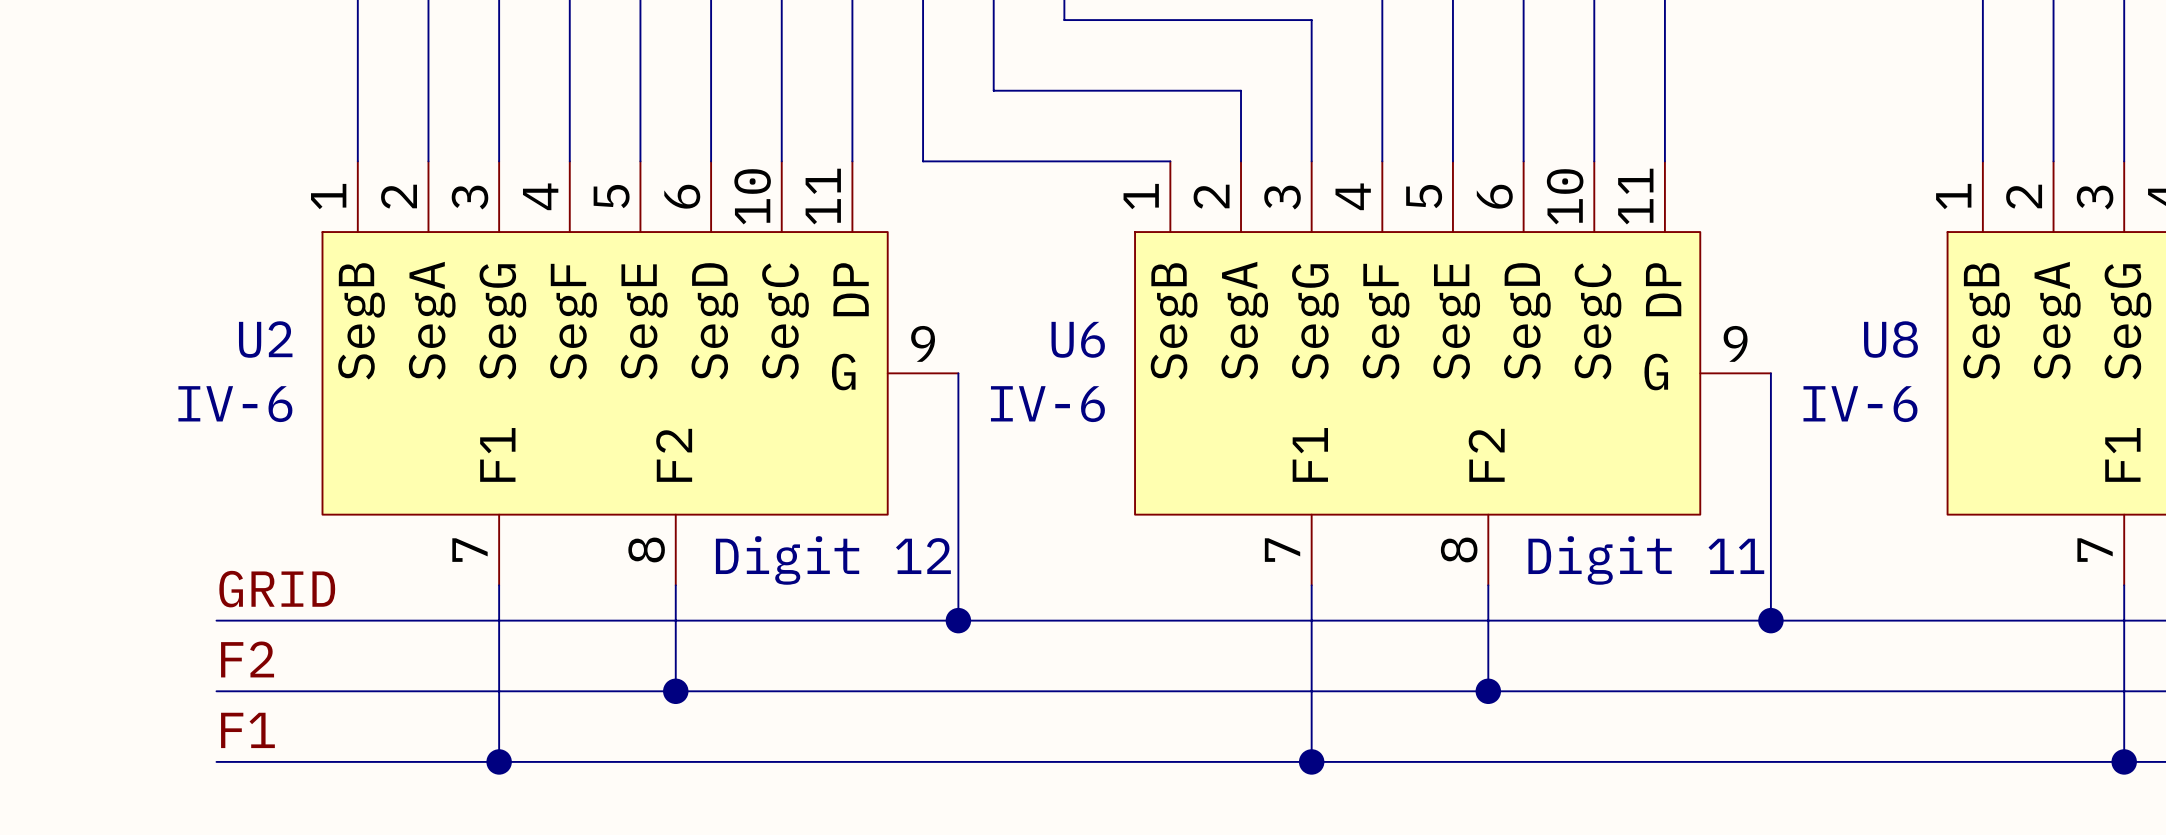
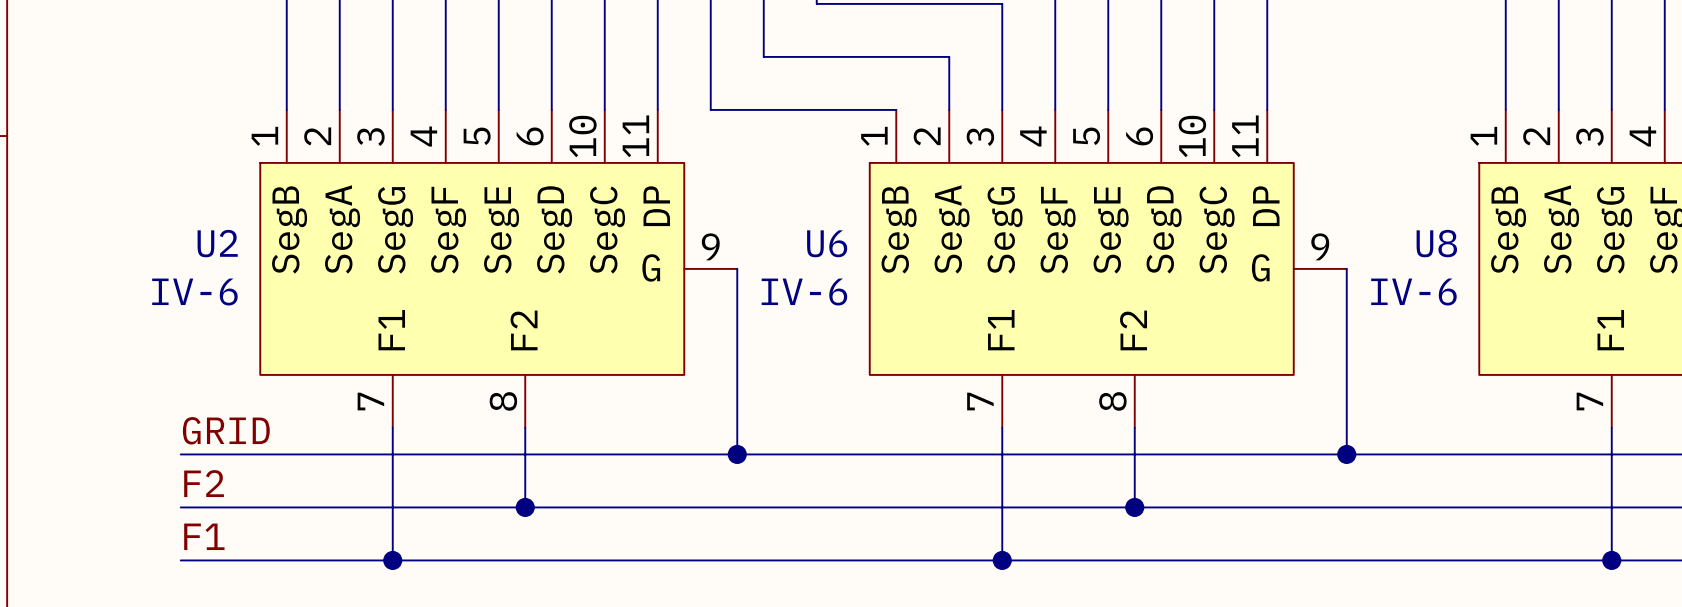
text: Digit 12 (833, 560) -> none
text: Digit 11 (1646, 560) -> none

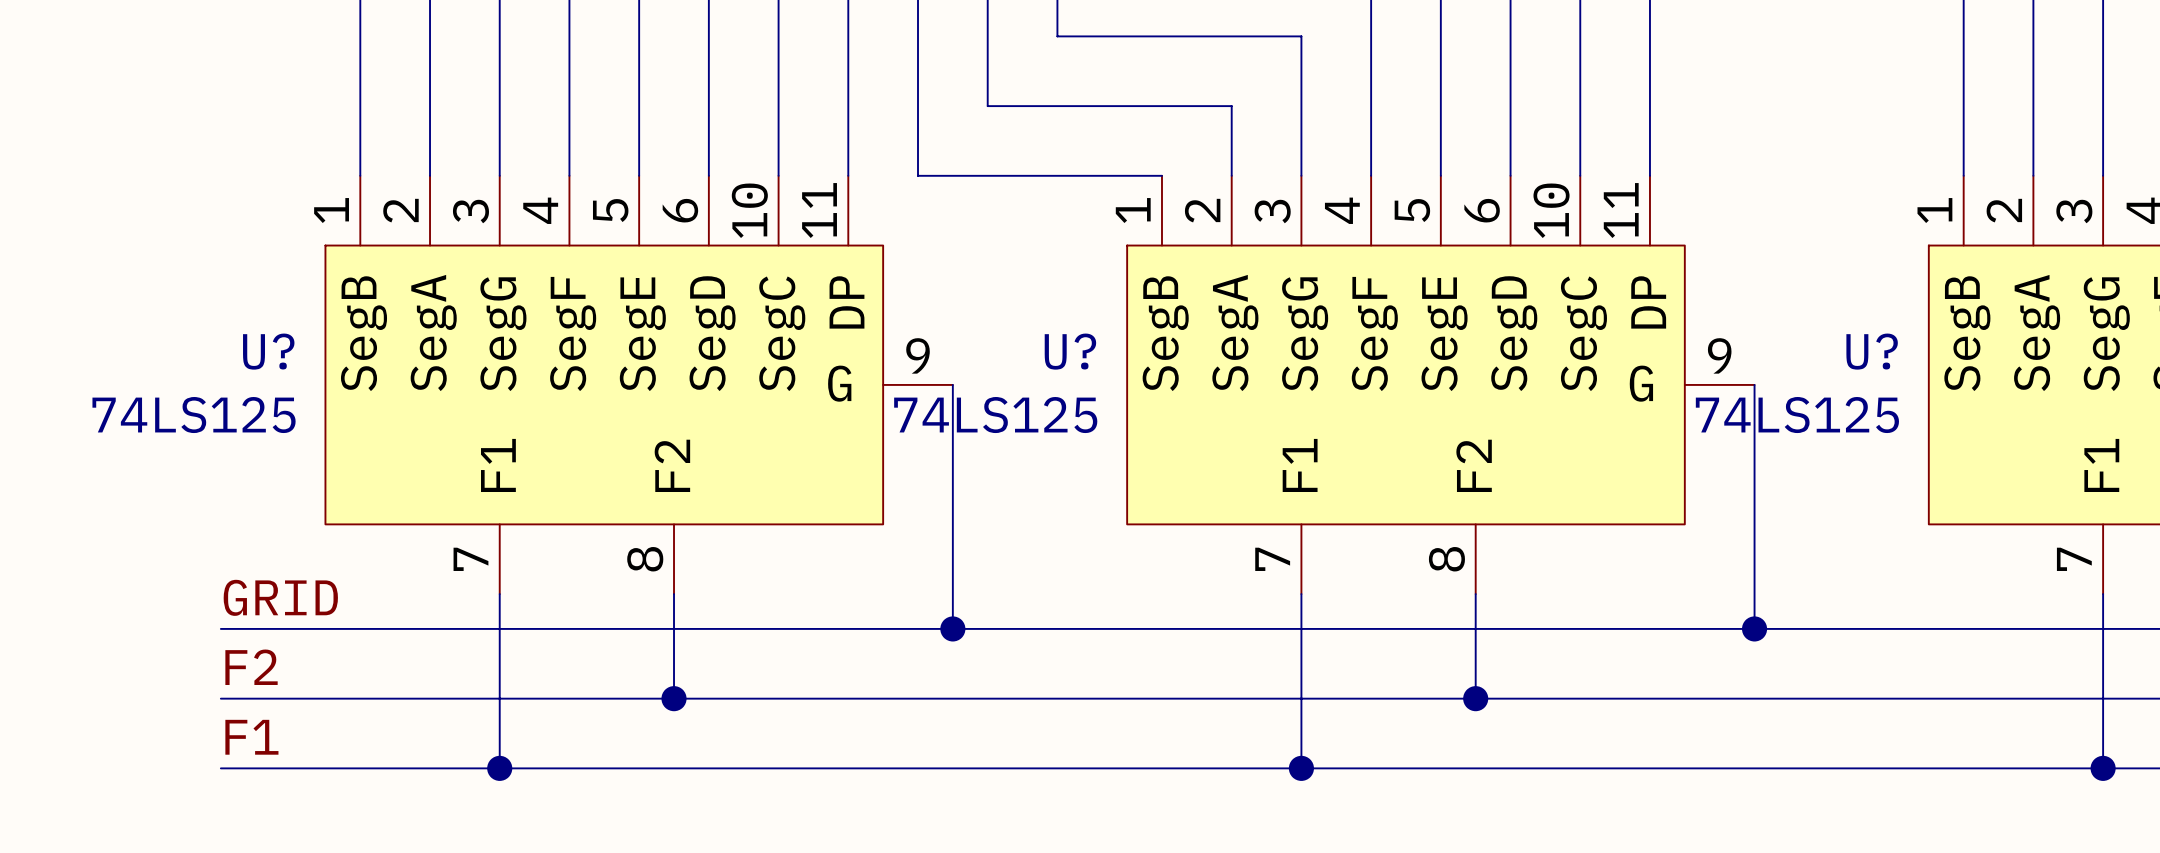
U2 name: U2 (217, 243) -> U? (268, 351)
U6 name: U6 (827, 243) -> U? (1070, 351)
U8 name: U8 (1436, 243) -> U? (1872, 351)
U2 value: IV-6 (194, 292) -> 74LS125 (194, 415)
U6 value: IV-6 (804, 292) -> 74LS125 (995, 415)
U8 value: IV-6 (1413, 292) -> 74LS125 (1797, 415)

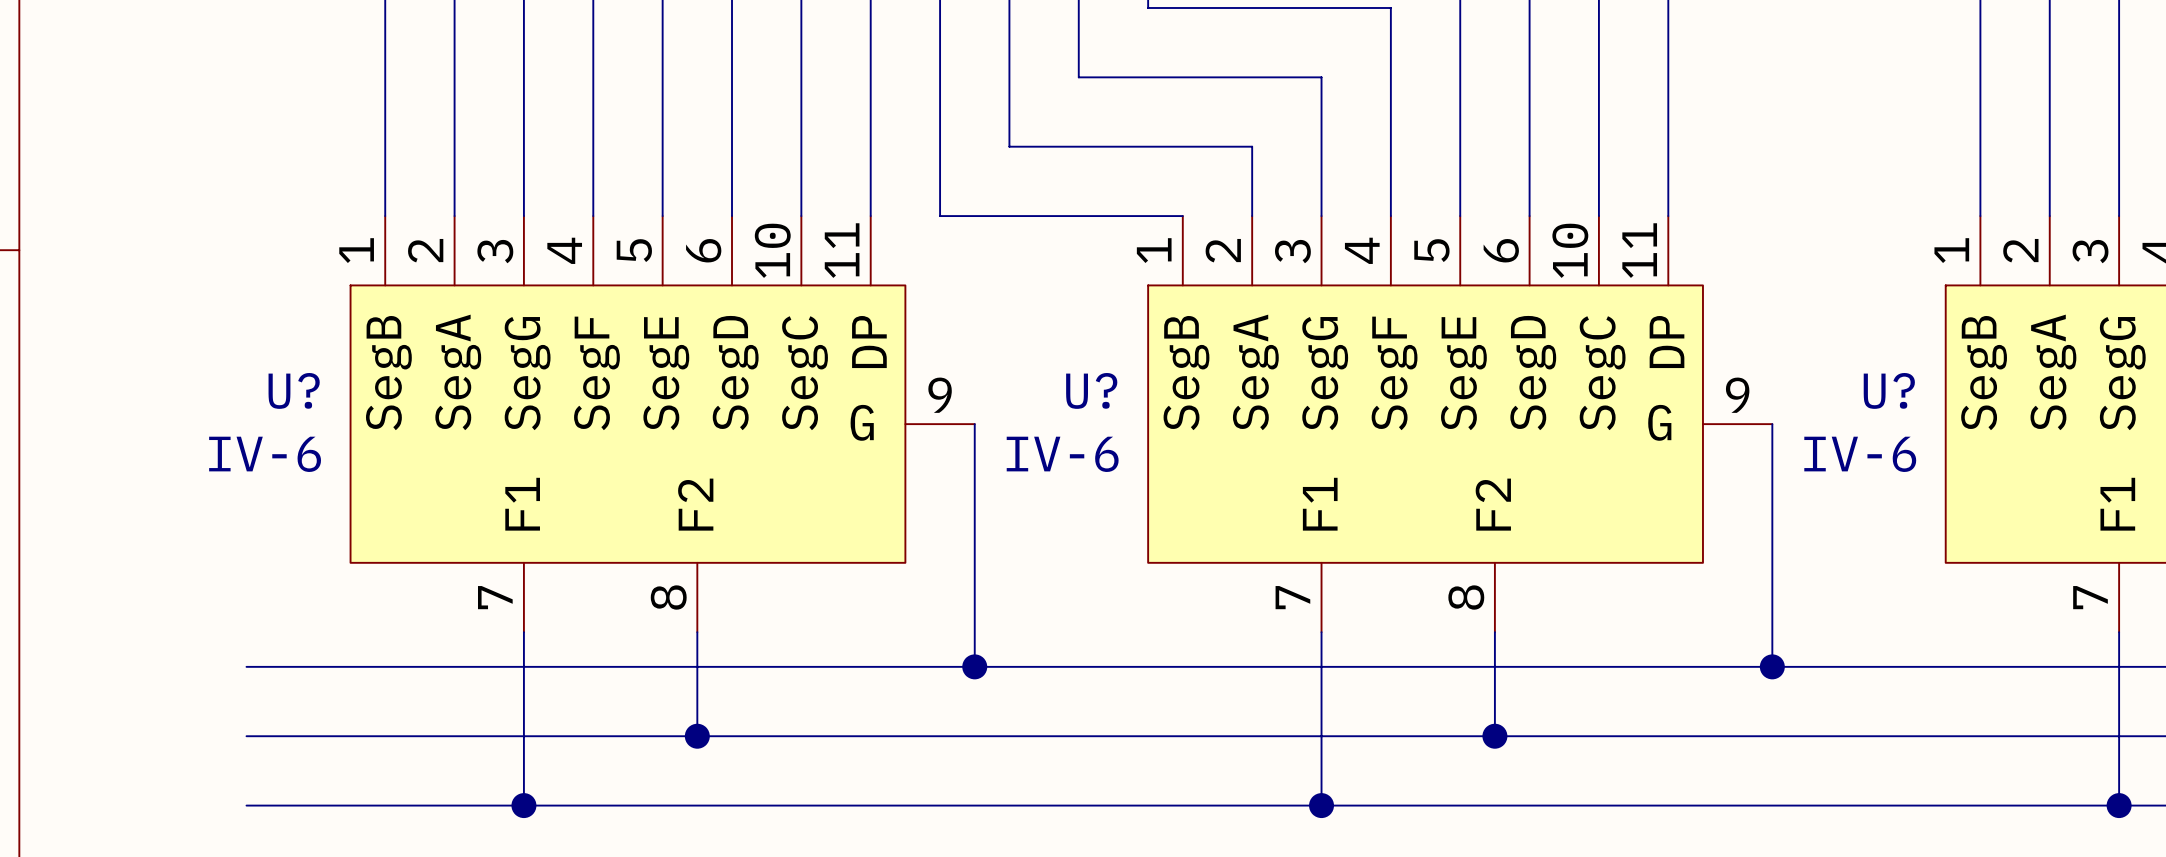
U? value: 74LS125 (194, 415) -> IV-6 (265, 454)
U? value: 74LS125 (995, 415) -> IV-6 (1062, 454)
U? value: 74LS125 (1797, 415) -> IV-6 (1860, 454)
label: GRID (280, 597) -> none
label: F2 (251, 667) -> none
label: F1 (251, 737) -> none

